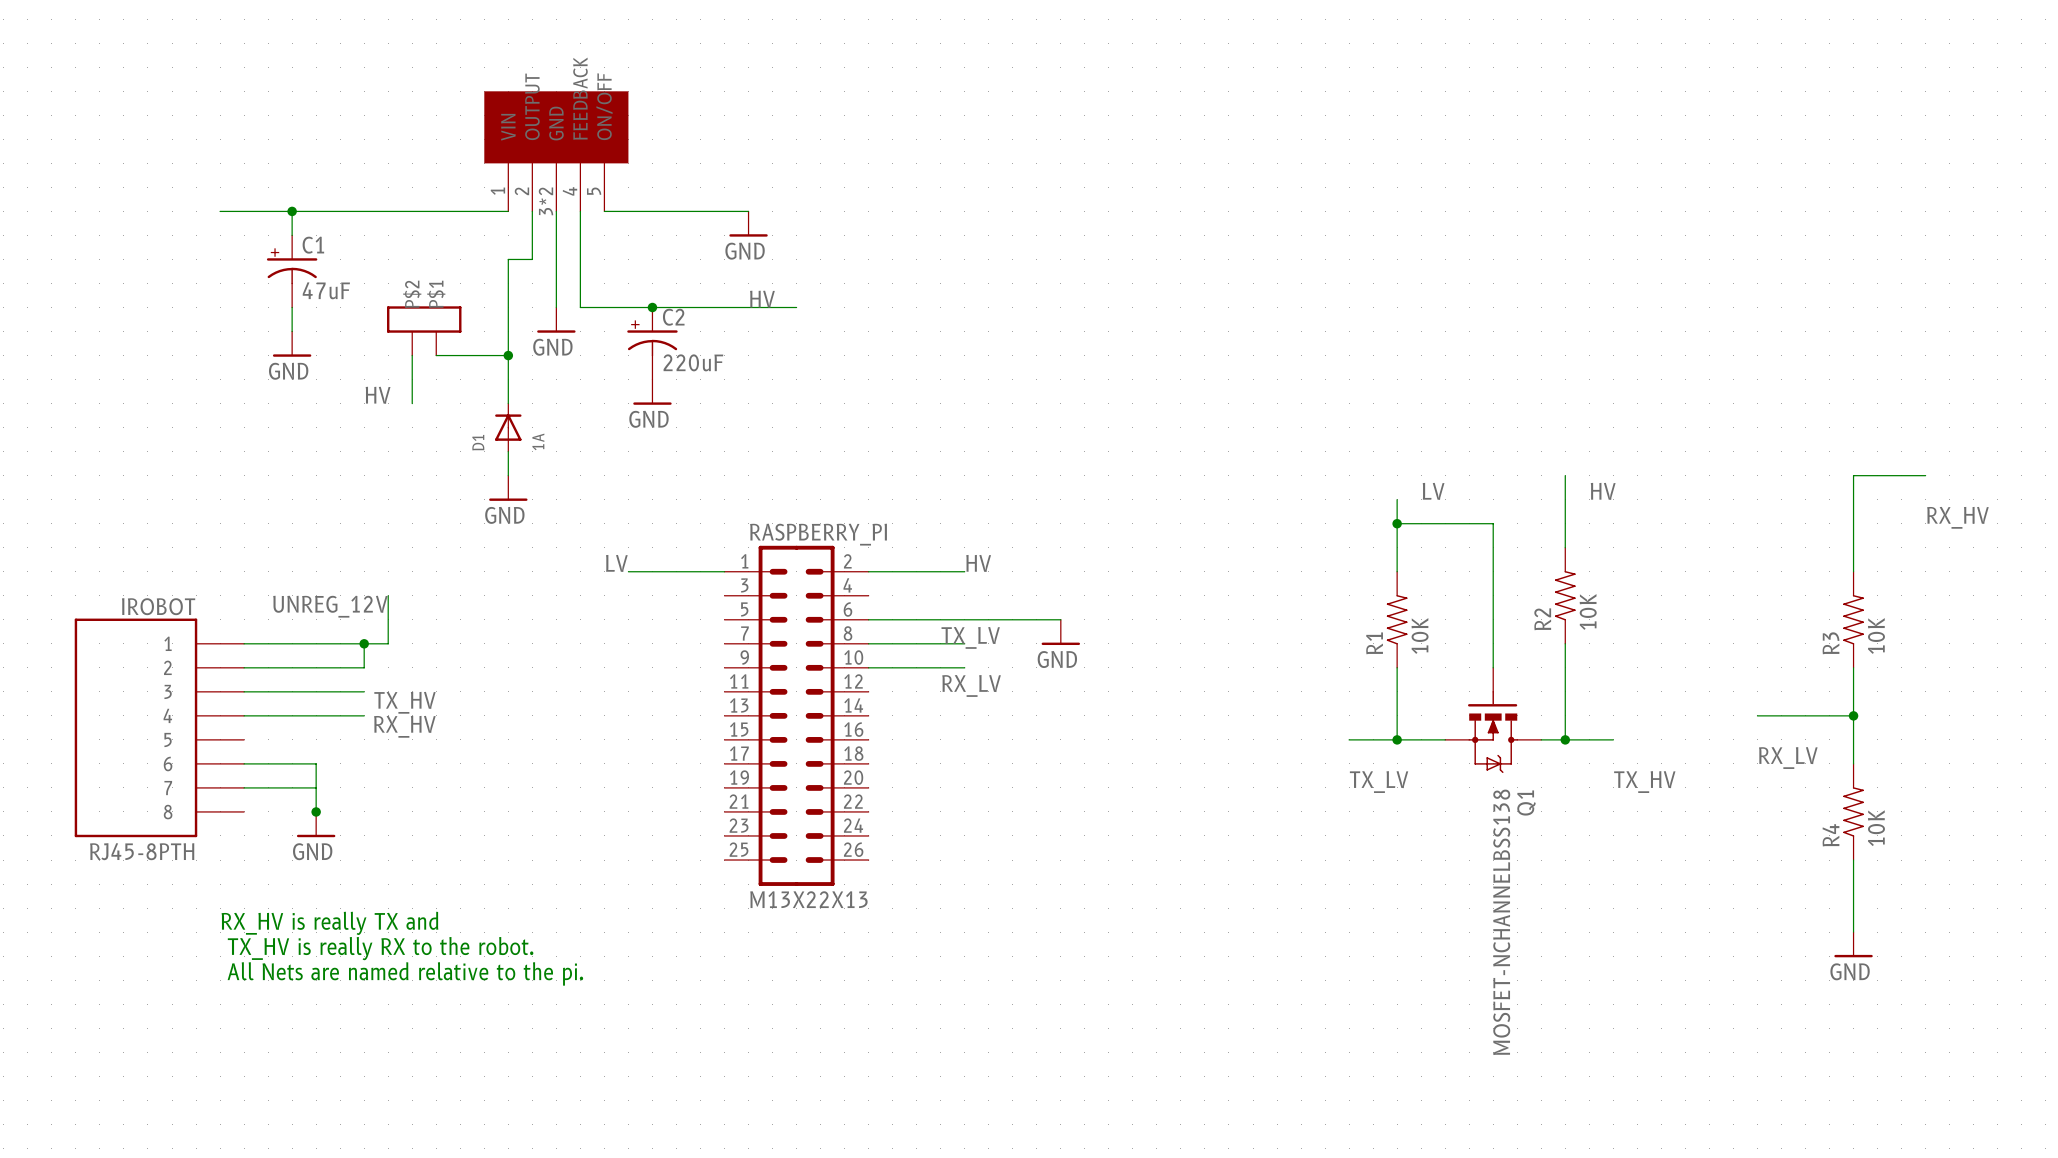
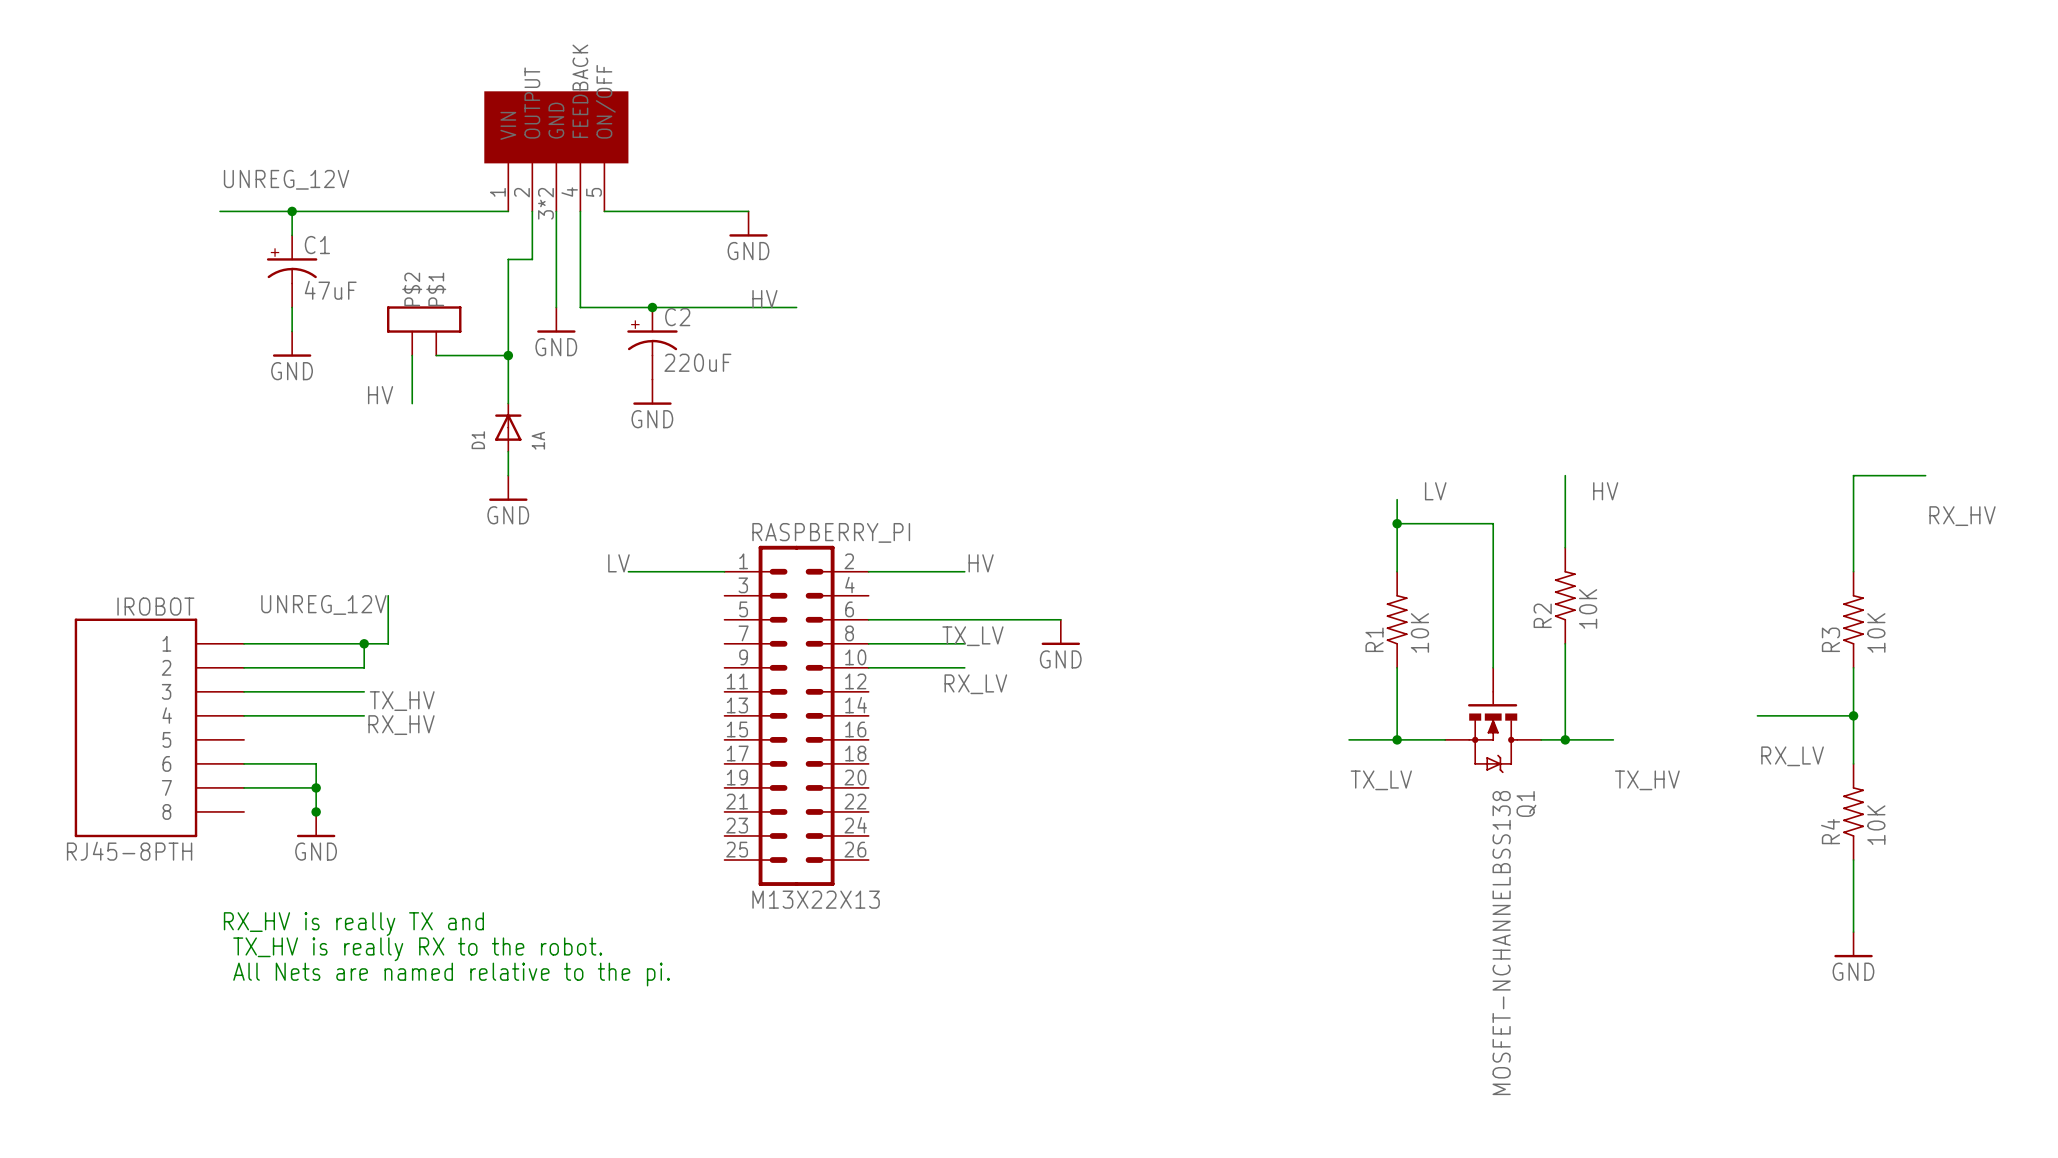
label: none -> UNREG_12V (286, 179)
junction: none -> (316, 787)

